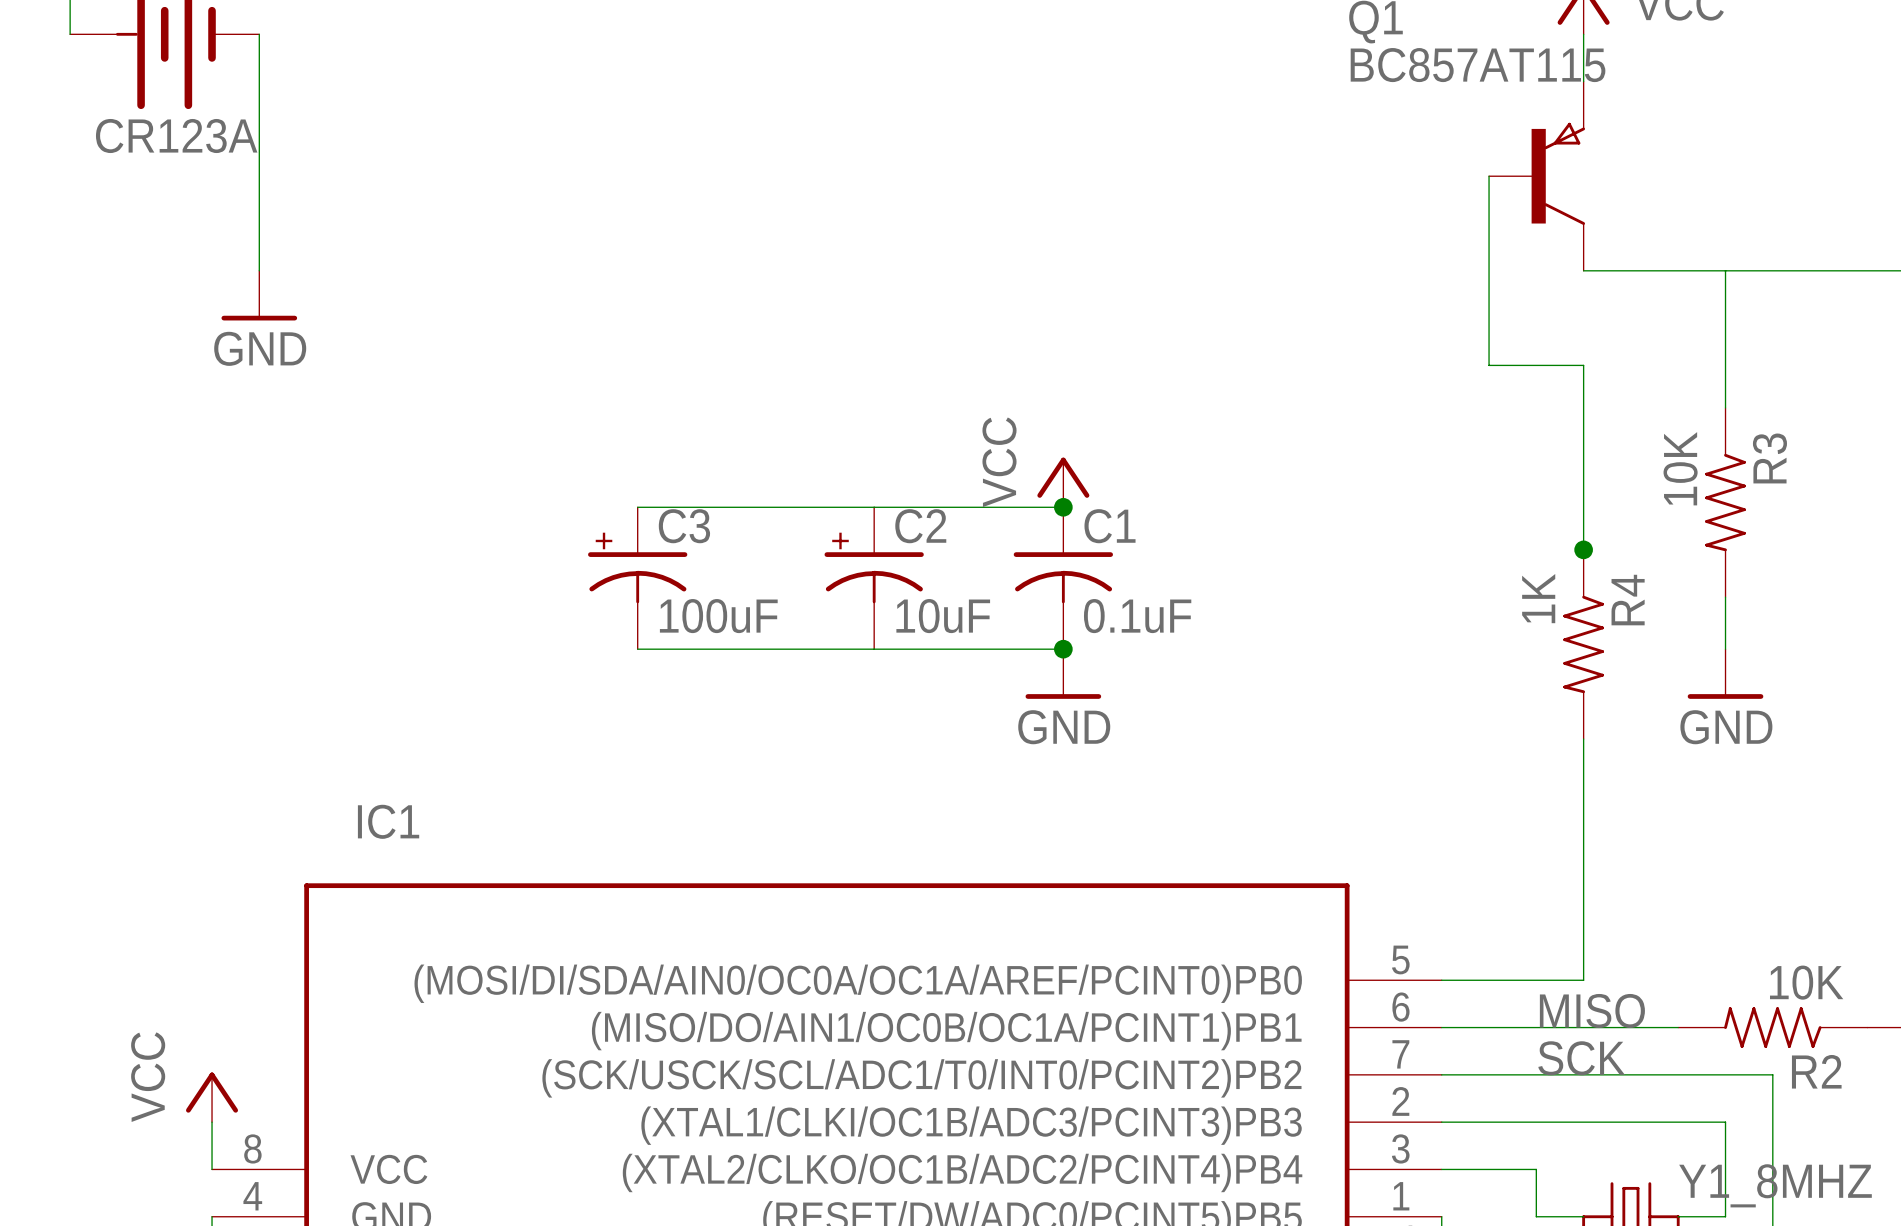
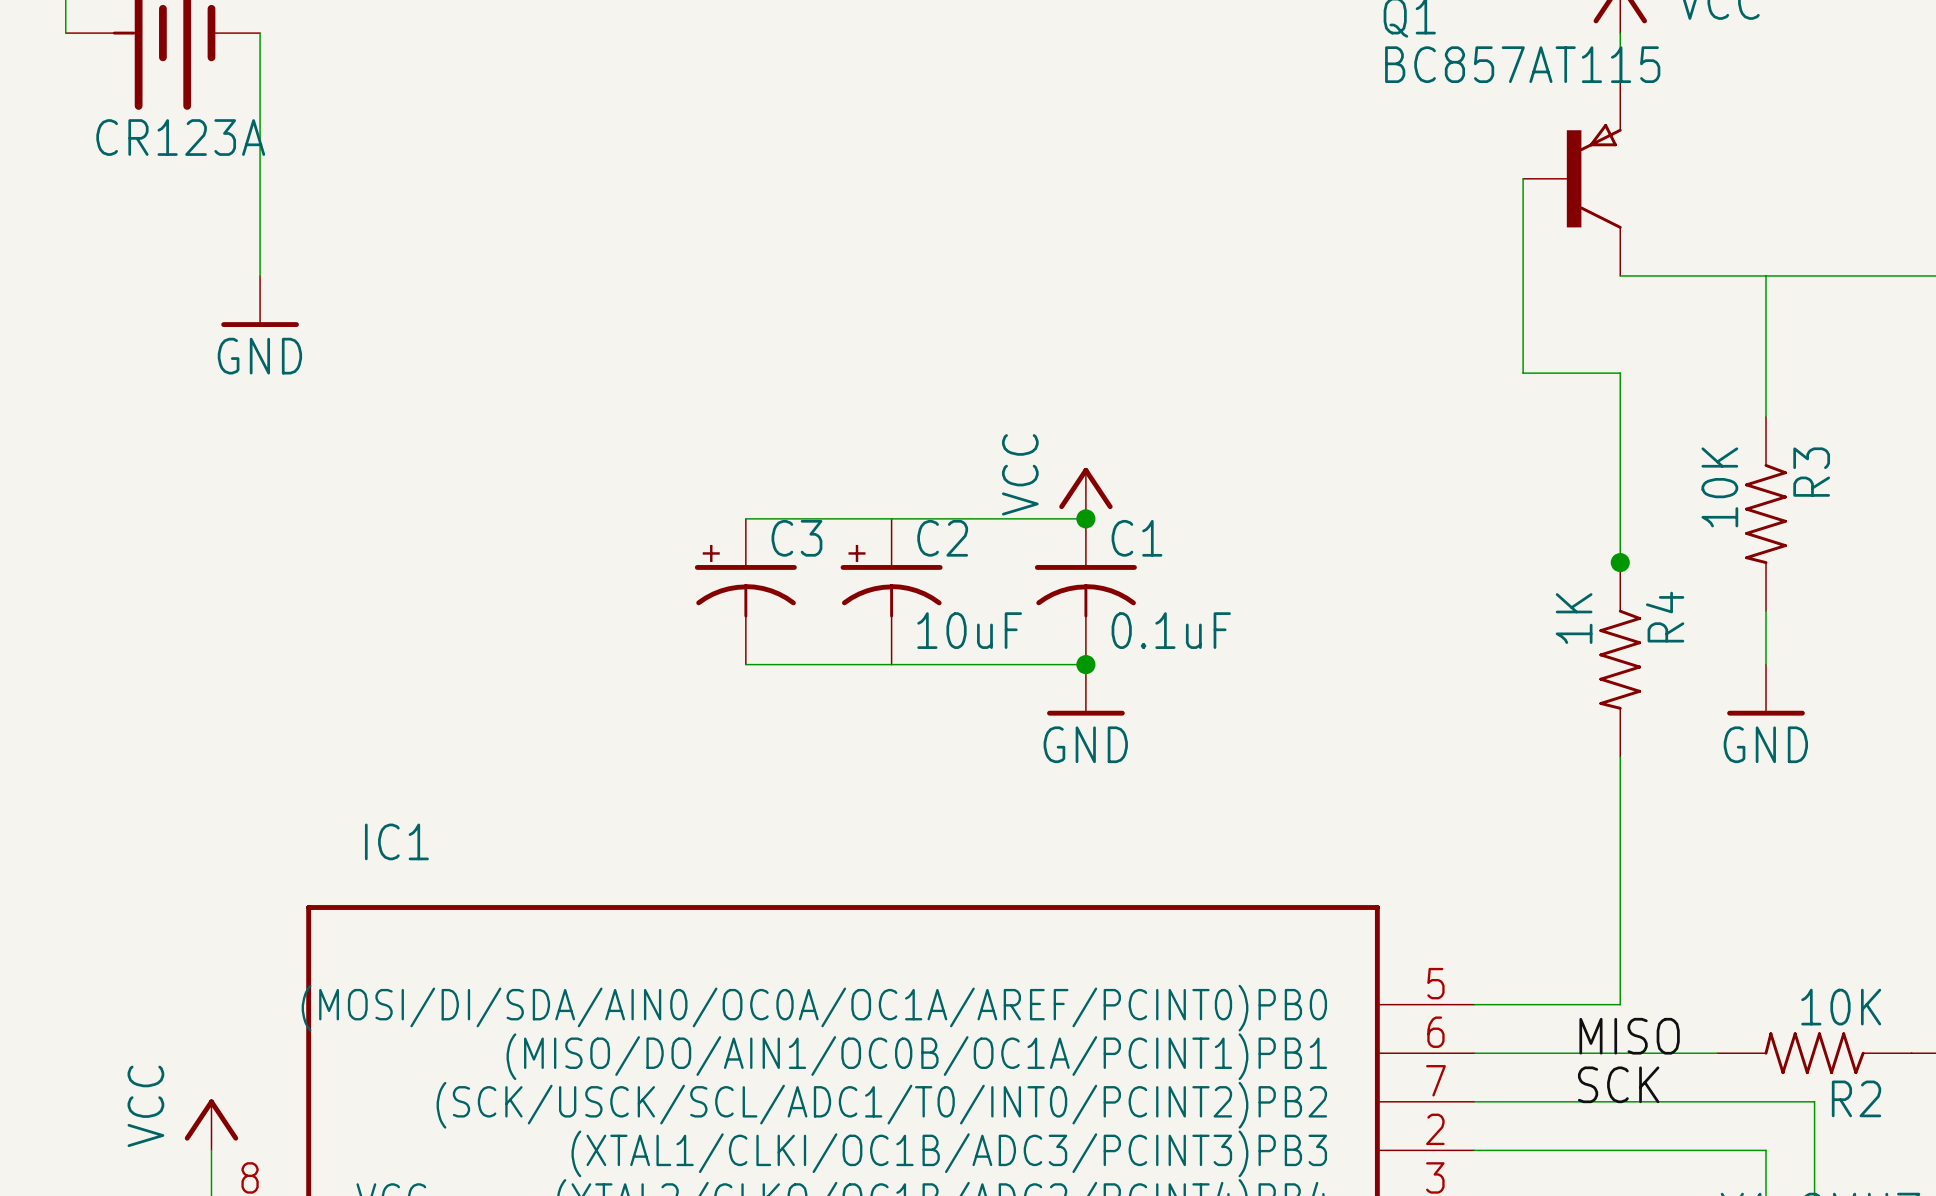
wire: (637, 507) (732, 507) -> none
C3 position: (637, 578) -> (745, 591)
C3 value: 100uF (718, 616) -> none
wire: (637, 649) (732, 649) -> none

